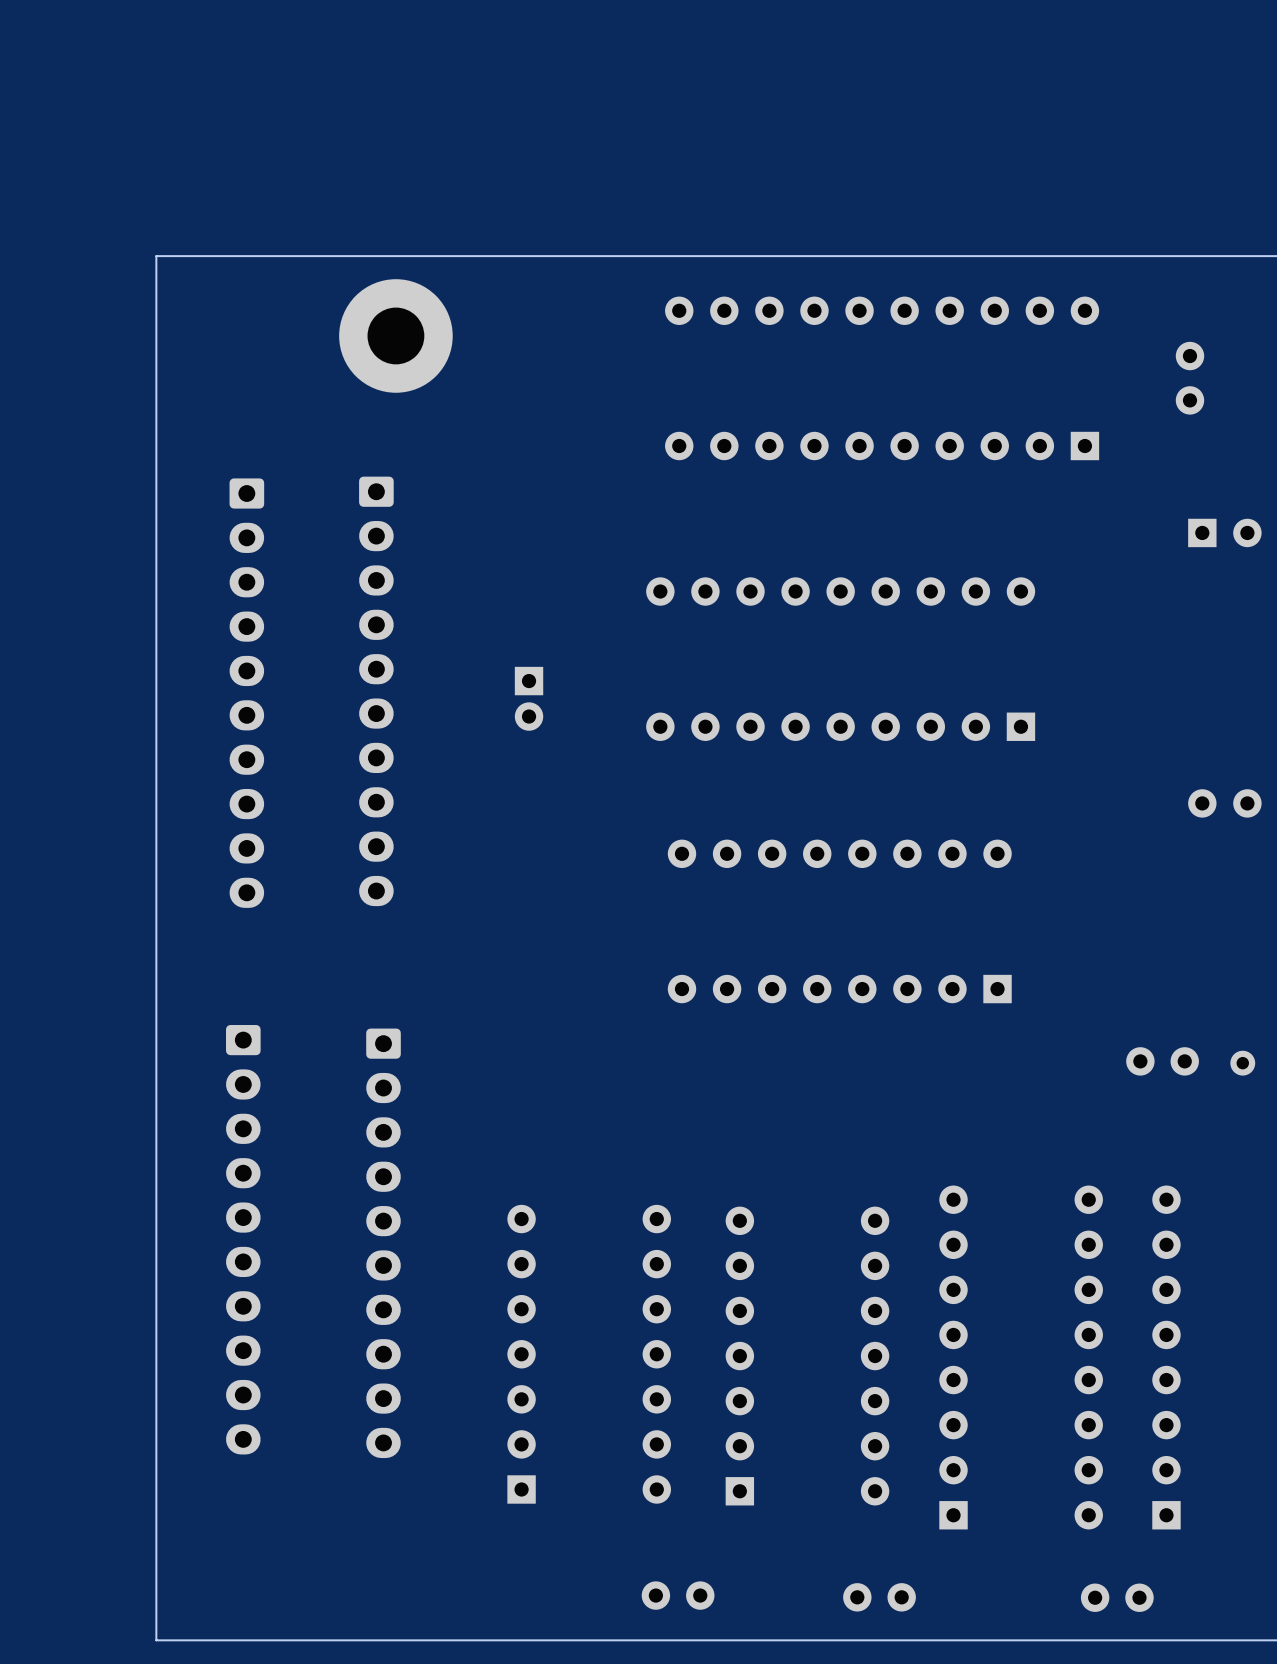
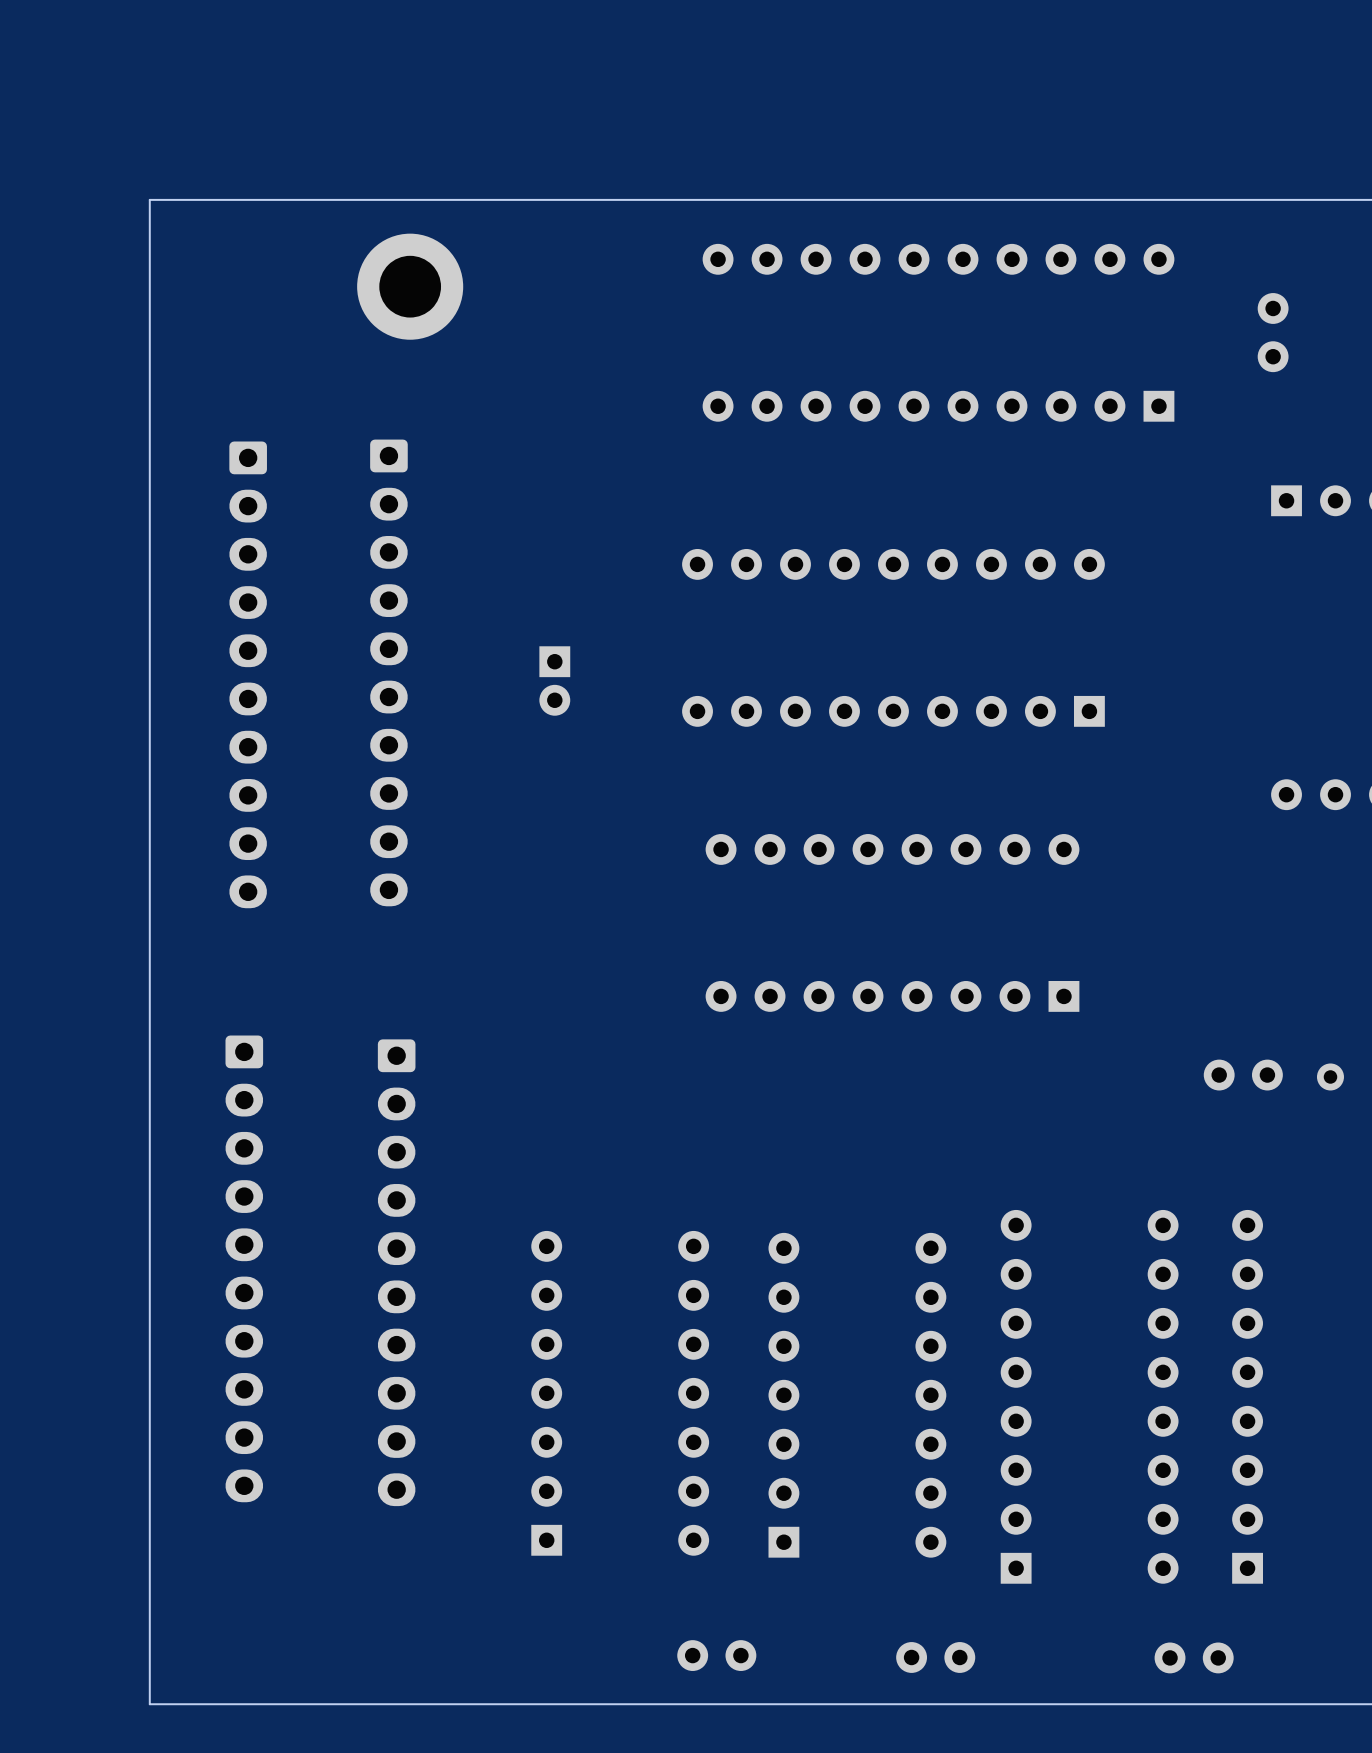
part footprint: [339, 279, 453, 393] -> [357, 233, 464, 340]

